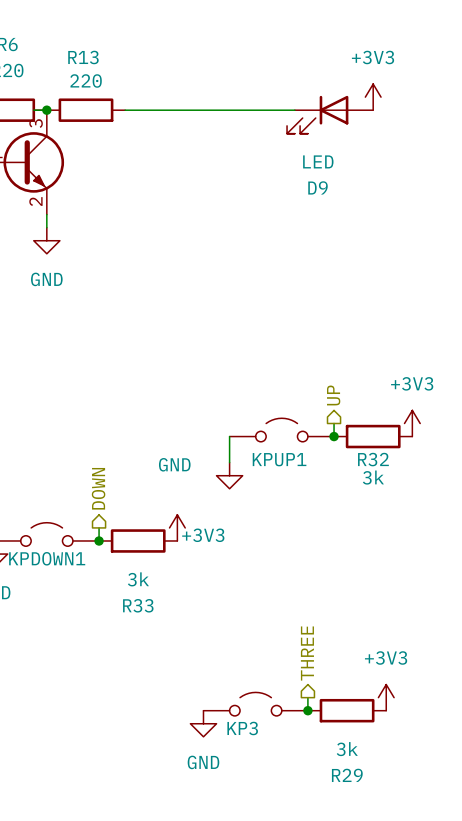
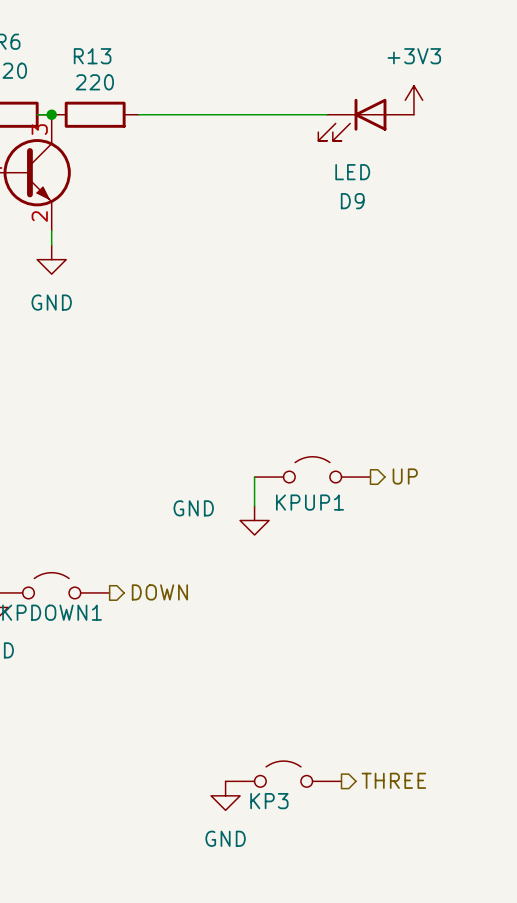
hierarchical label rotation: 0° (333, 395) -> 90° clockwise (405, 476)
hierarchical label position: UP (333, 395) -> UP (405, 476)
power symbol: +3V3 (412, 423) -> none
junction: (334, 436) -> none
R32: 3k (373, 436) -> none
hierarchical label rotation: 0° (98, 488) -> 90° clockwise (159, 592)
hierarchical label position: DOWN (98, 488) -> DOWN (159, 592)
power symbol: +3V3 (177, 527) -> none
junction: (99, 540) -> none
R33: 3k (138, 540) -> none
hierarchical label rotation: 0° (307, 653) -> 90° clockwise (393, 780)
hierarchical label position: THREE (307, 653) -> THREE (393, 780)
power symbol: +3V3 (386, 697) -> none
junction: (307, 710) -> none
R29: 3k (347, 710) -> none

